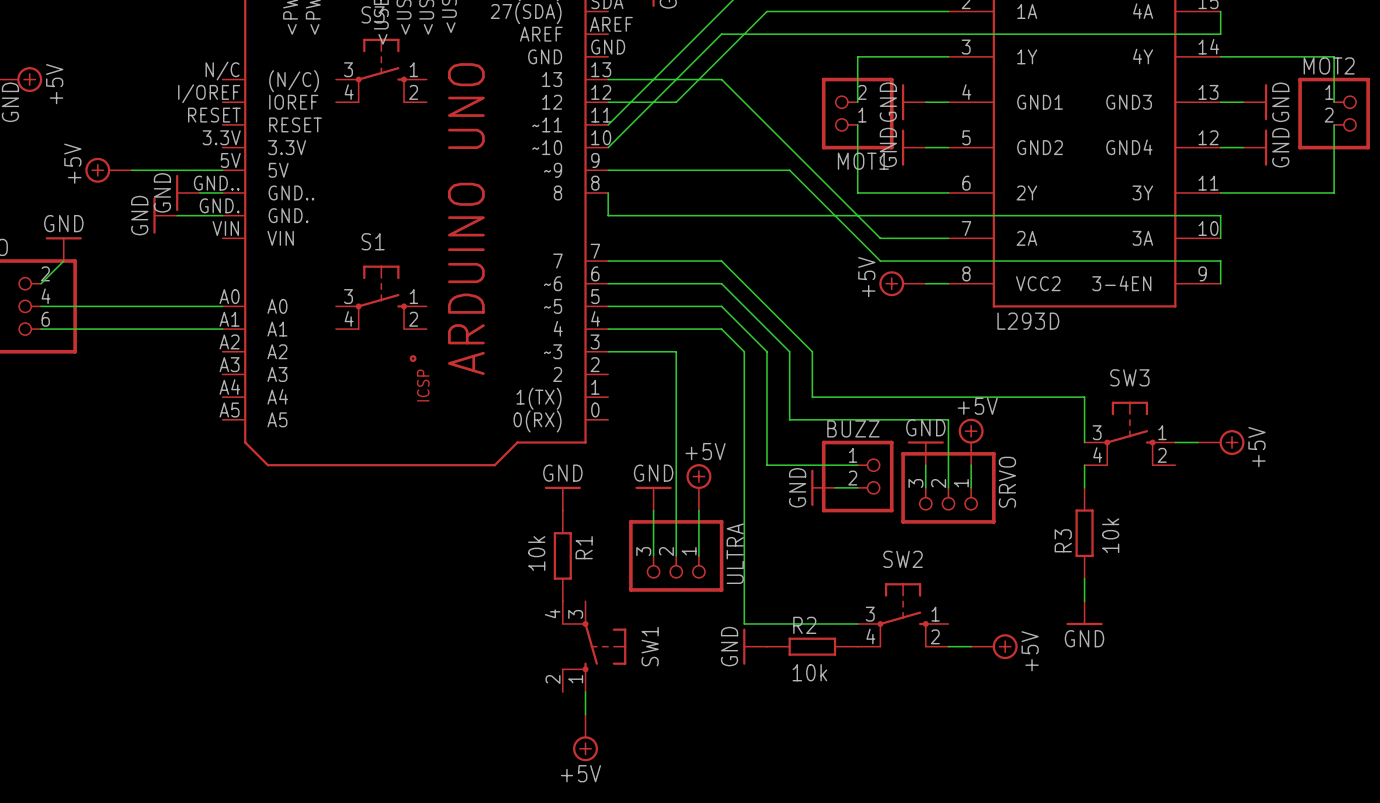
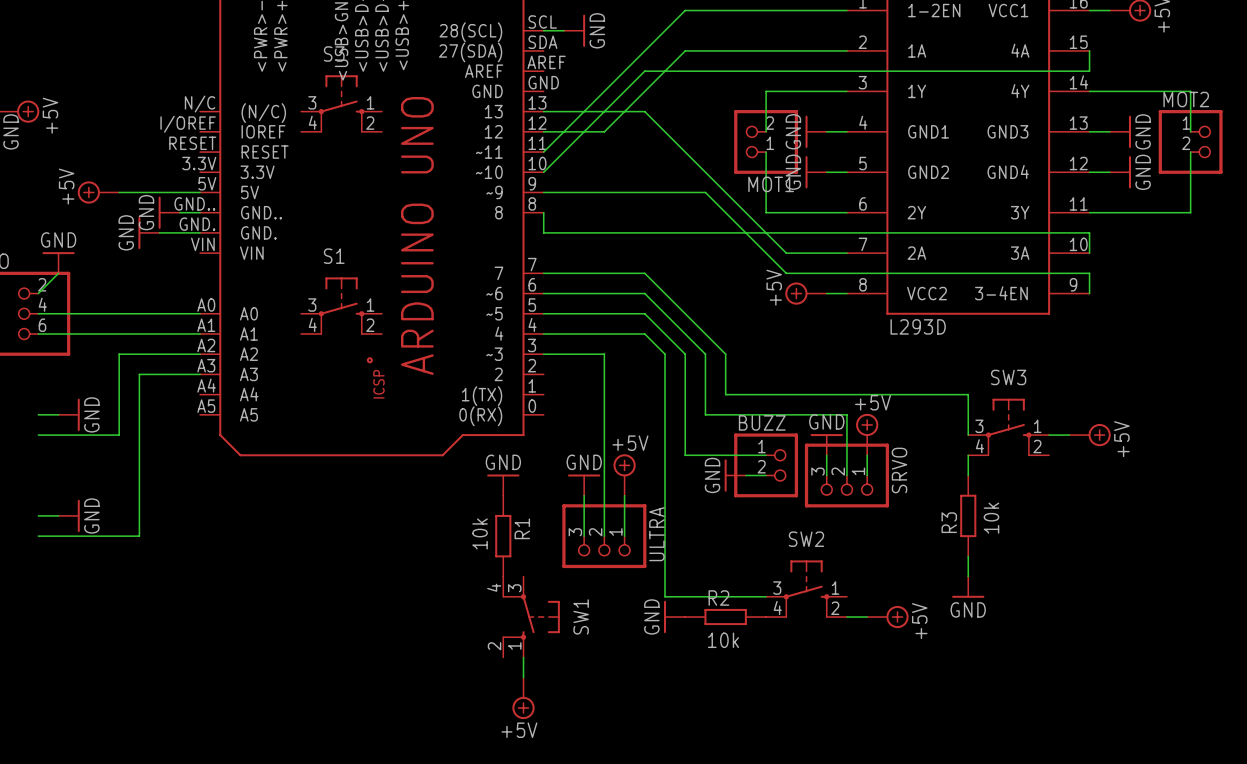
wire: none -> (200, 354) (119, 354) (119, 435) (38, 435)
wire: none -> (200, 374) (139, 374) (139, 536) (38, 536)
wire: none -> (38, 414) (58, 414)
power symbol: none -> GND (69, 414)
wire: none -> (38, 515) (58, 515)
power symbol: none -> GND (69, 515)

